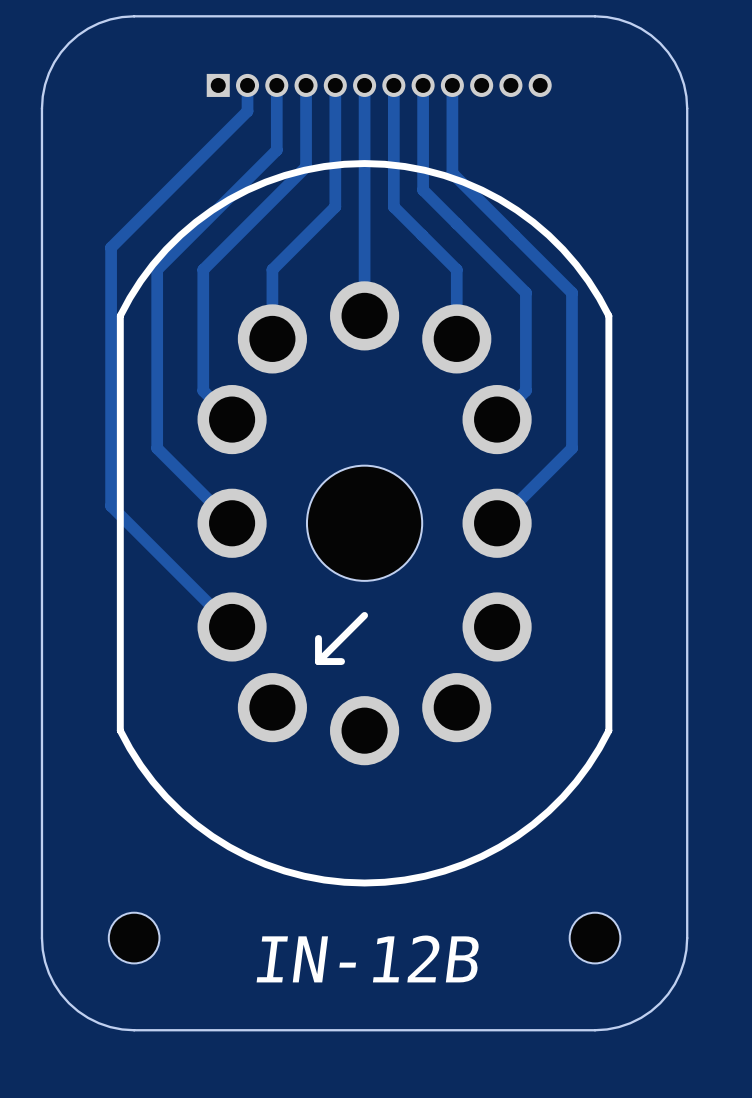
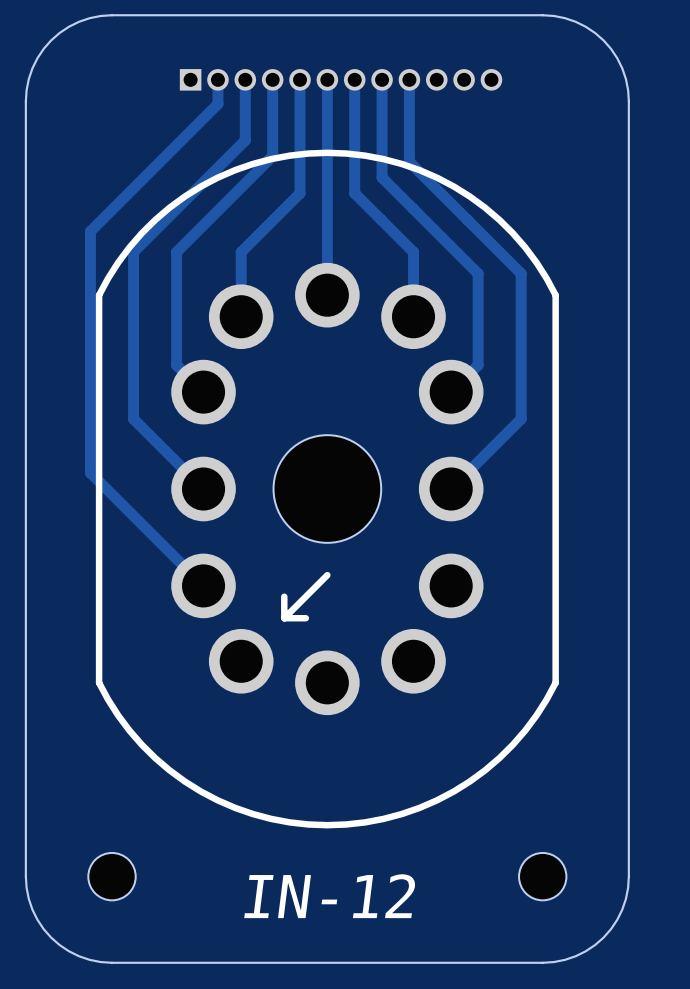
IN-12B name: IN-12B (367, 958) -> IN-12 (329, 896)

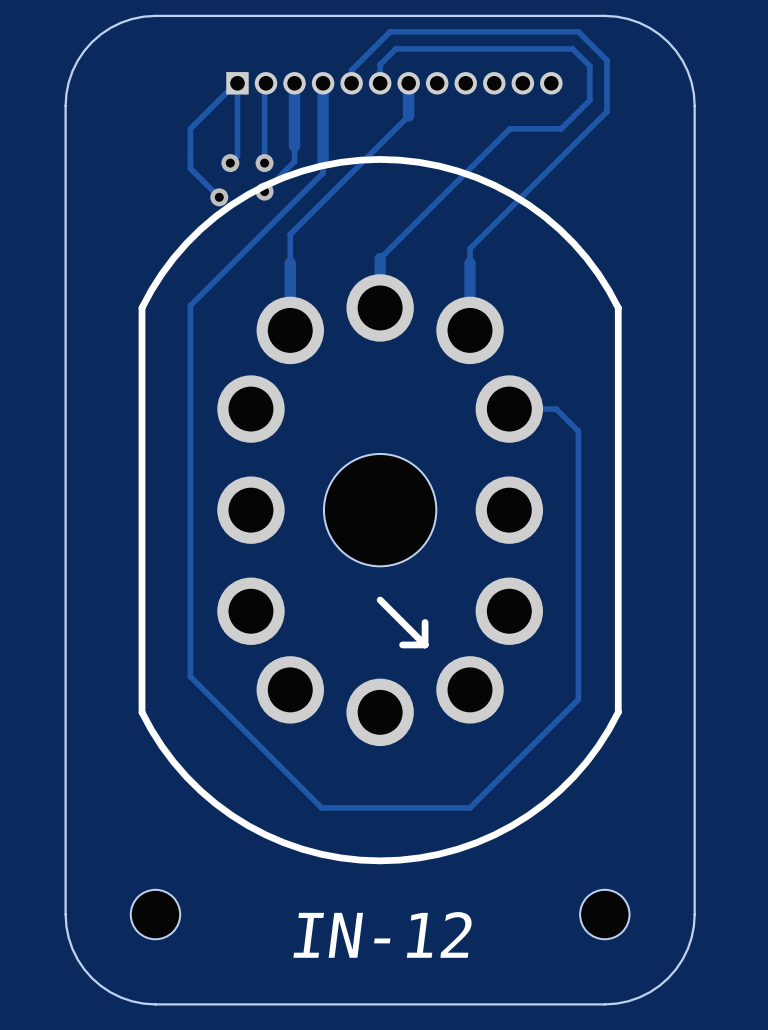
track: (300, 79) (300, 193) (241, 252) -> (408, 116) (290, 234) (290, 263)
track: (327, 79) (327, 247) -> (380, 83) (380, 64) (395, 48) (572, 48) (589, 66) (589, 100) (561, 128) (509, 128) (380, 258)
track: (382, 79) (382, 177) (478, 273) (478, 365) (451, 392) -> (323, 162) (323, 173) (190, 305) (190, 676) (321, 807) (470, 807) (578, 699) (578, 431) (556, 409) (509, 409)
track: (409, 79) (409, 161) (521, 273) (521, 419) (451, 489) -> none
track: (217, 81) (217, 103) (90, 231) (90, 472) (203, 585) -> (266, 84) (264, 163)
track: (354, 111) (354, 193) (413, 252) -> (351, 83) (351, 70) (390, 31) (578, 31) (606, 60) (606, 111) (470, 248) (470, 263)
track: (245, 140) (133, 252) (133, 419) (203, 489) -> (294, 146) (294, 161) (264, 191)
IN-12 footprint: [95, 149, 559, 829] -> [138, 156, 622, 865]
track: none -> (230, 163) (237, 155) (237, 83) (190, 128) (190, 168) (219, 197)
via: none -> (230, 163)
via: none -> (264, 163)
track: (272, 156) (176, 252) (176, 365) (203, 392) -> none
via: none -> (264, 191)
via: none -> (219, 197)

